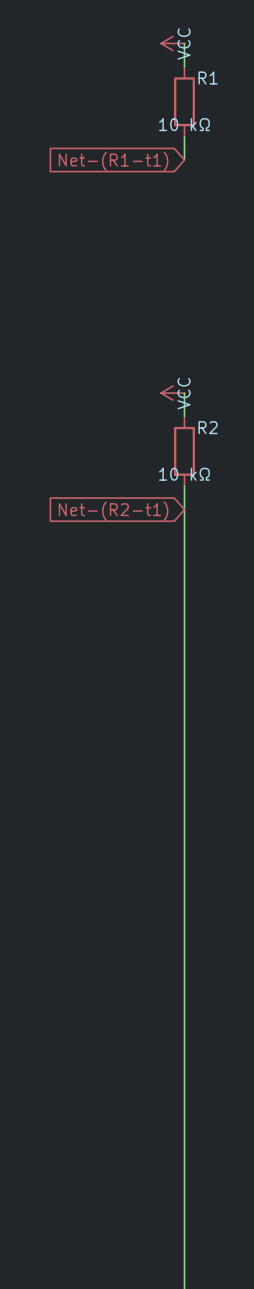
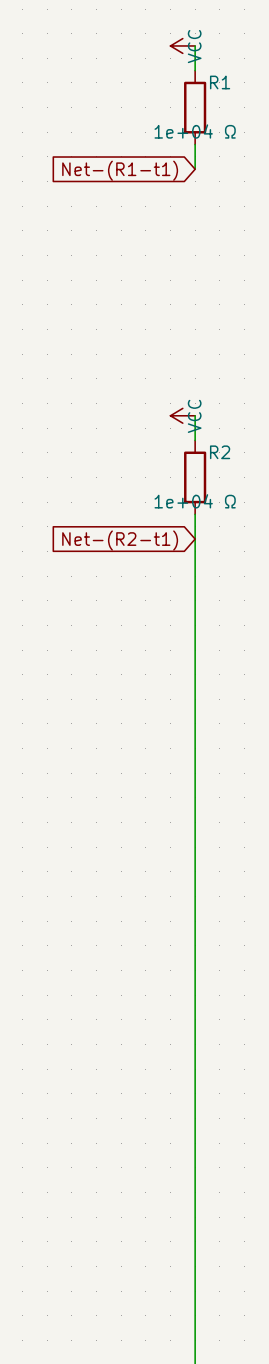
R1 value: 10 kΩ (184, 124) -> 1e+04 Ω (195, 131)
R2 value: 10 kΩ (184, 474) -> 1e+04 Ω (195, 501)

